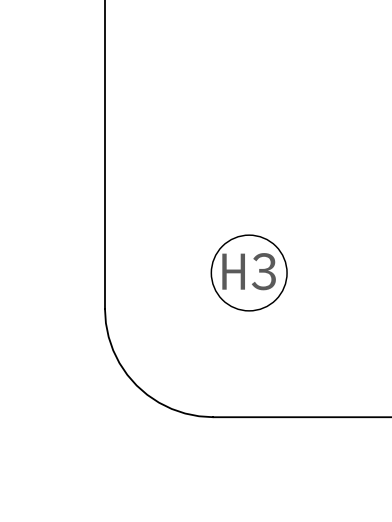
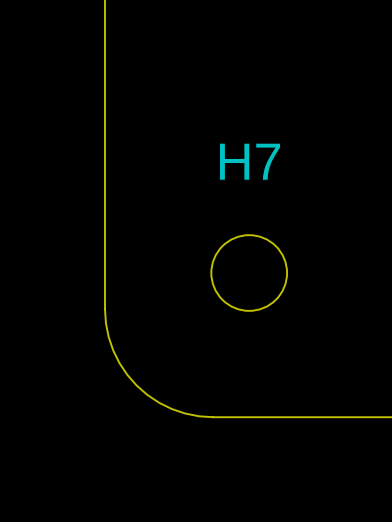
H3 name: H3 (249, 271) -> H7 (250, 161)

